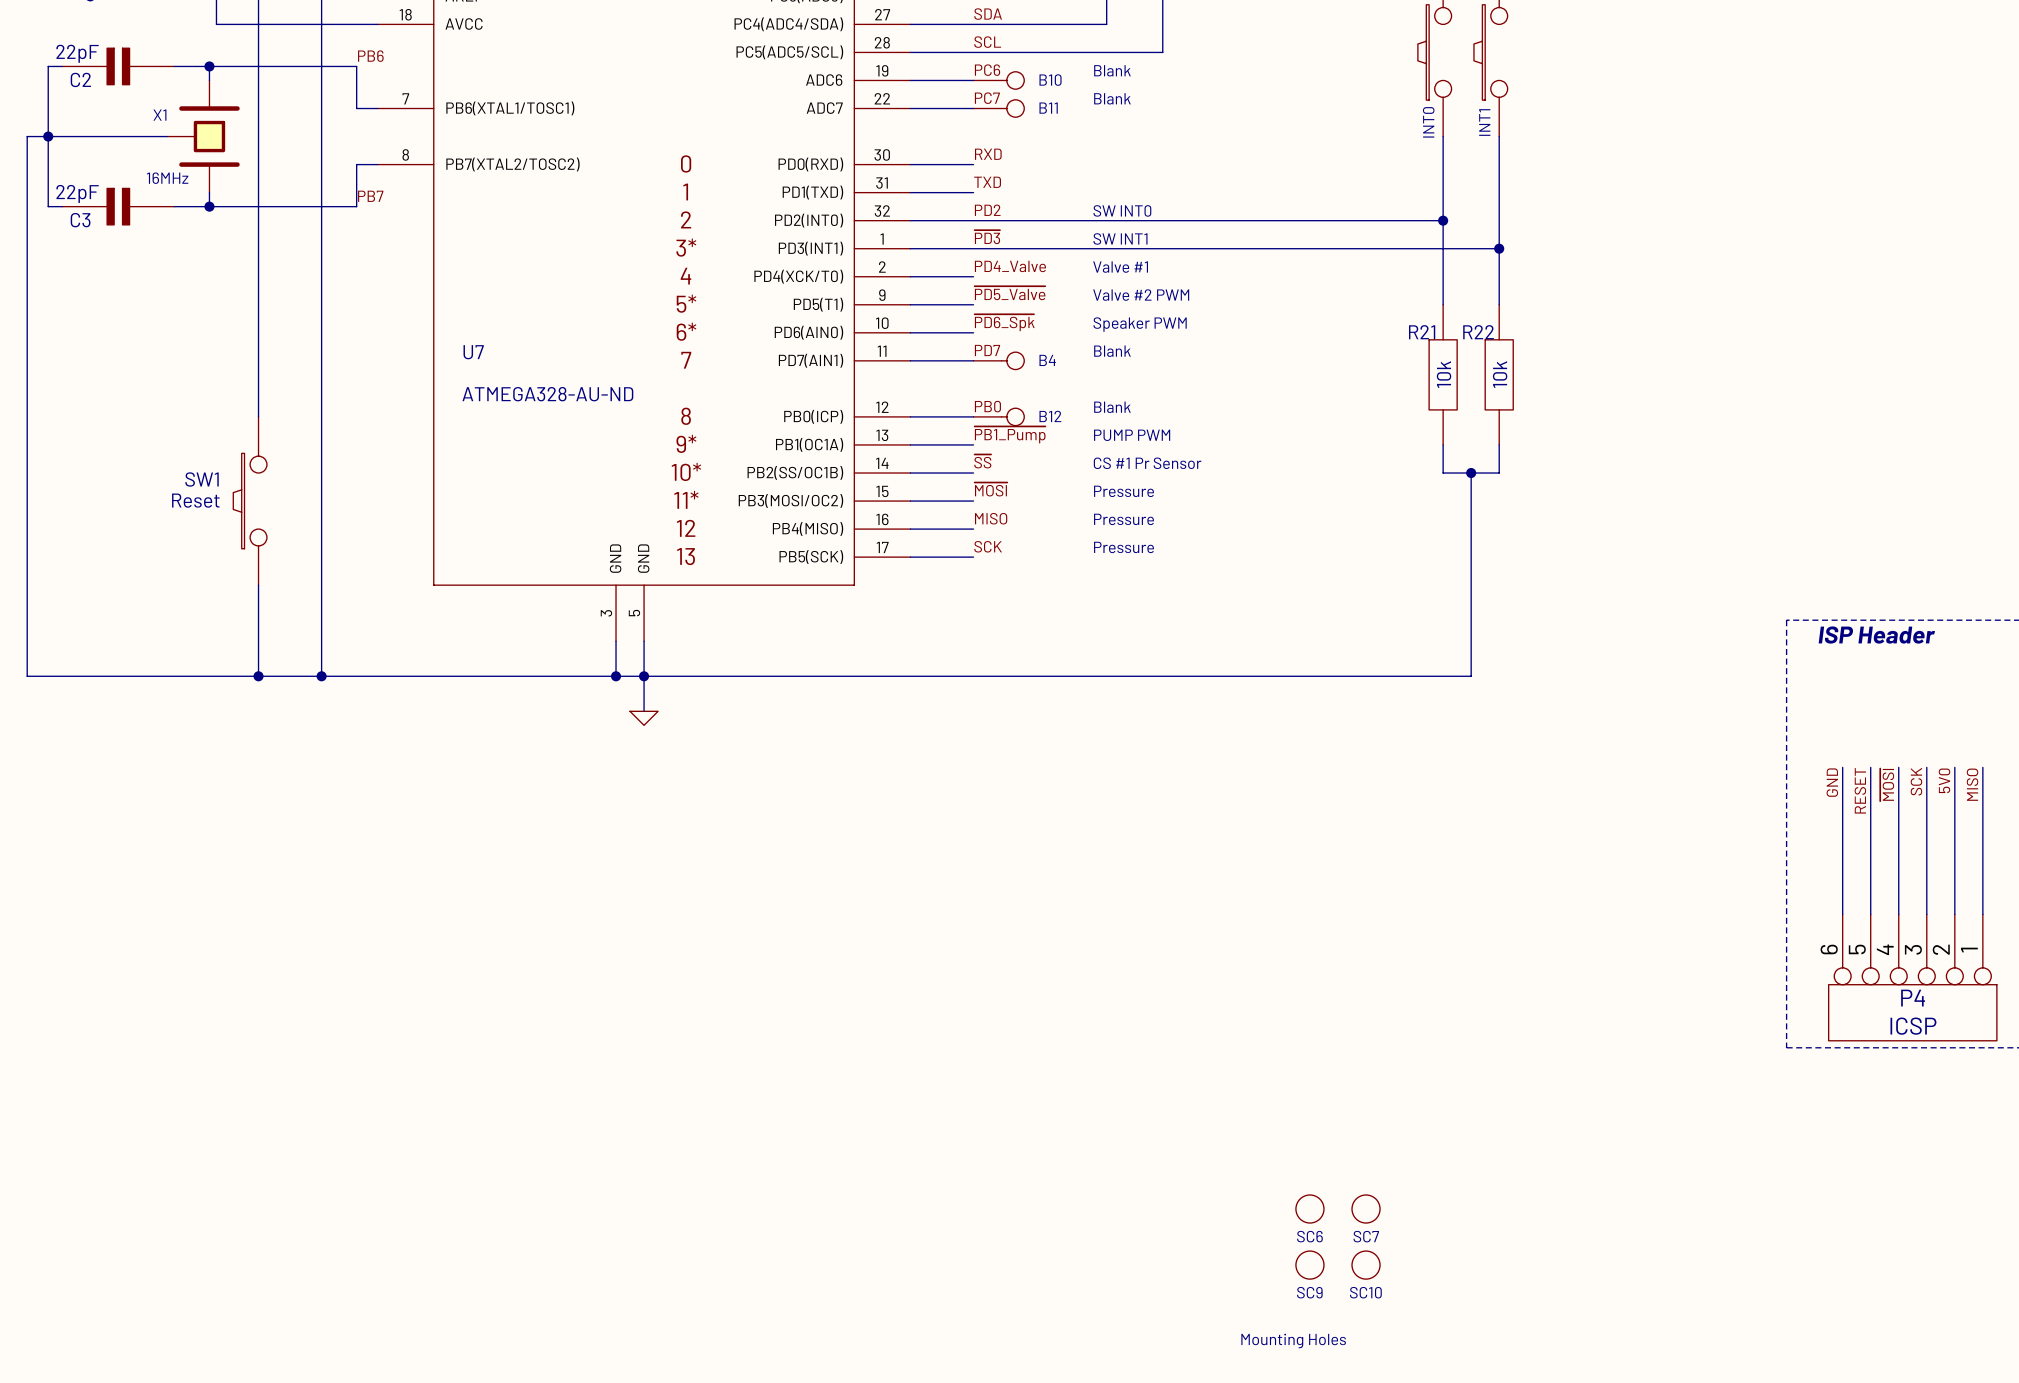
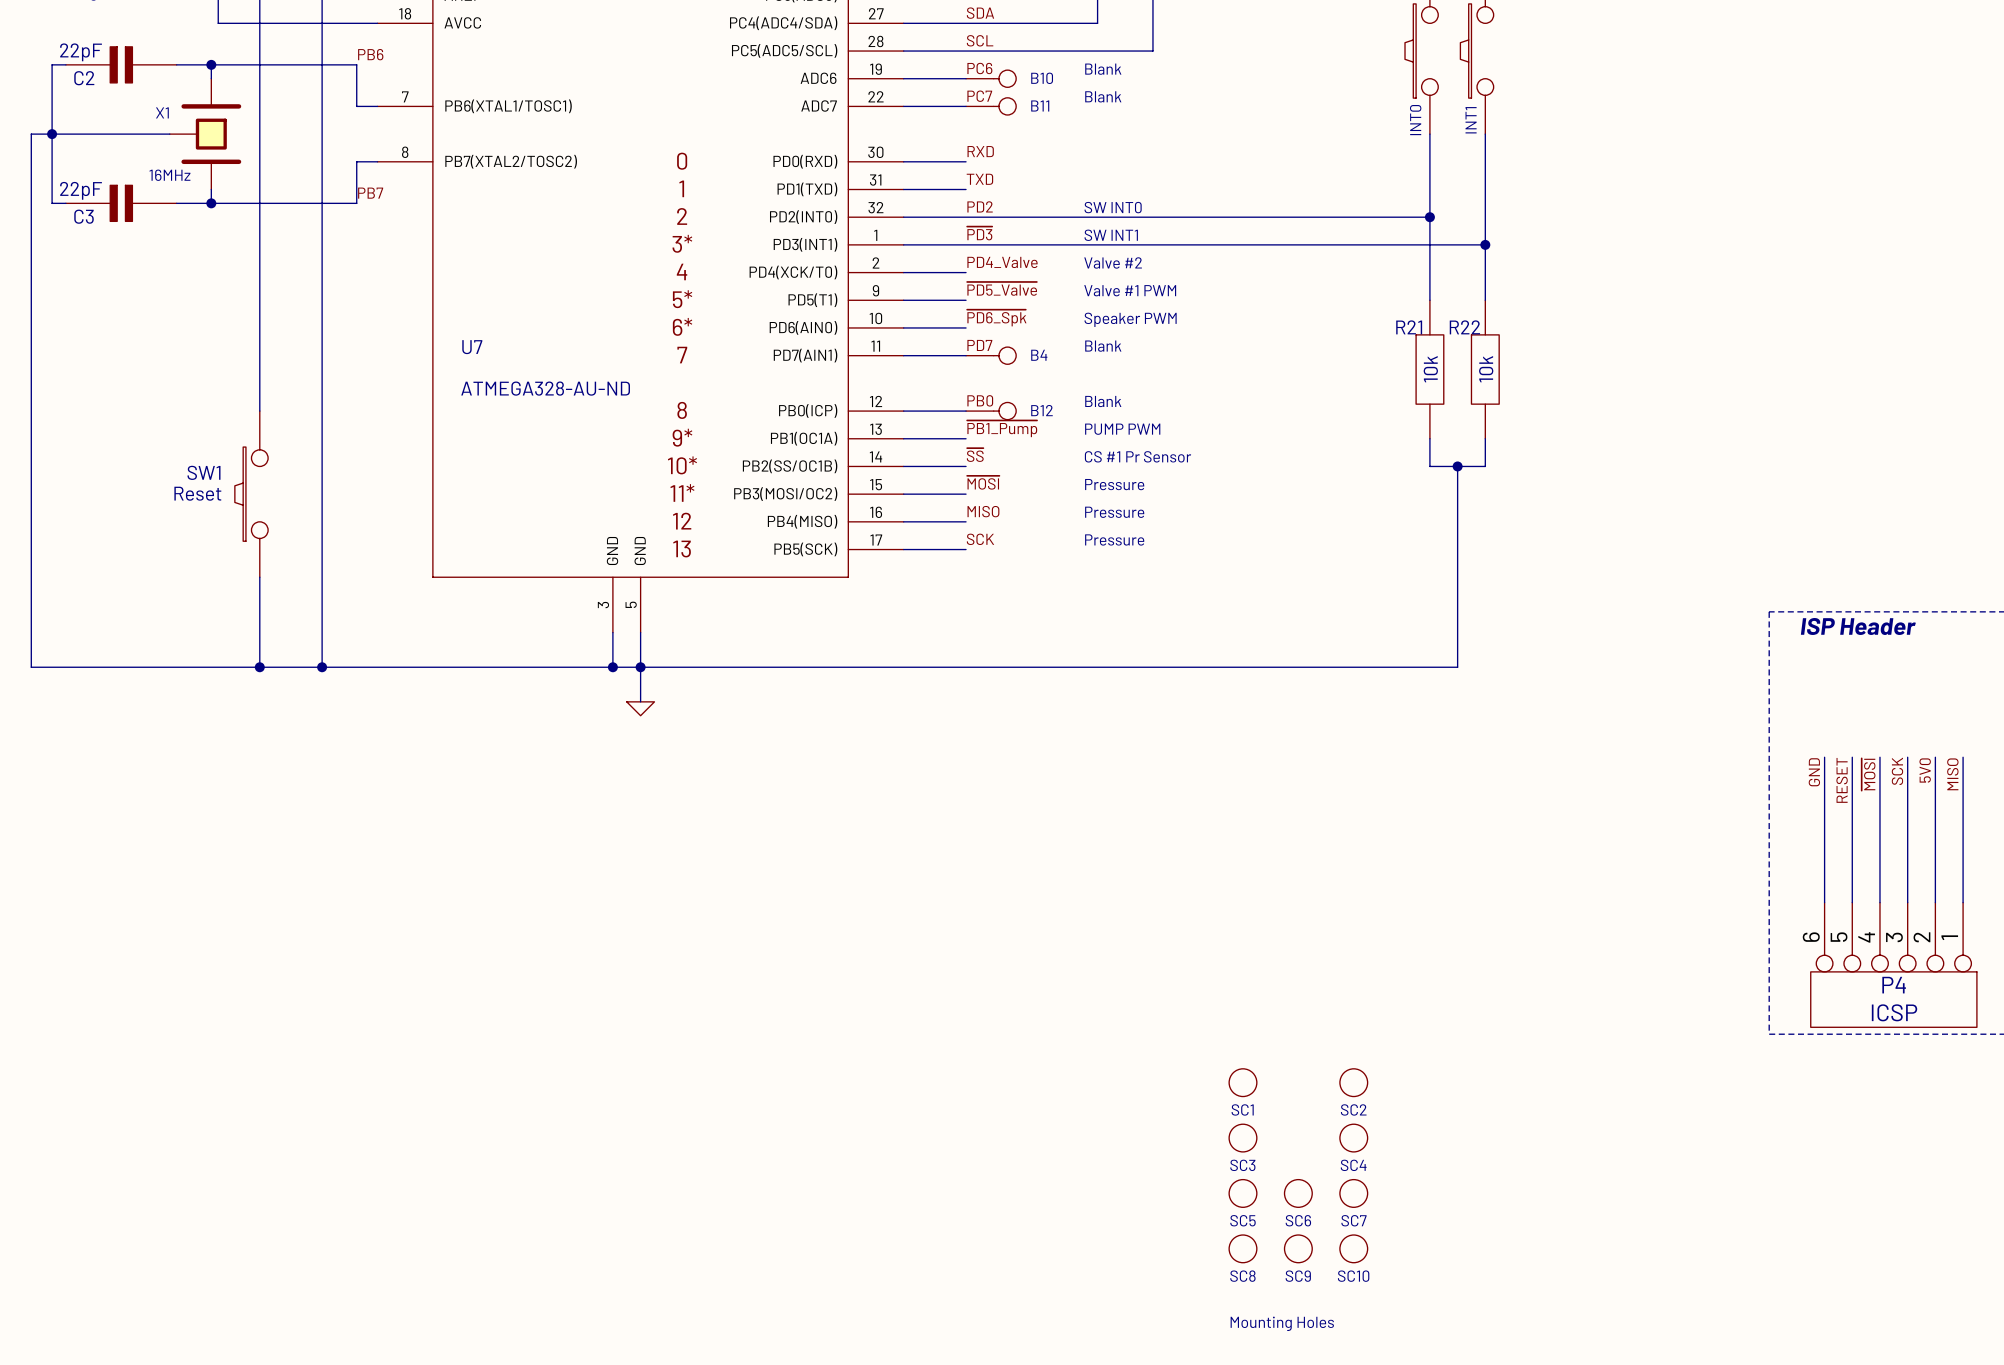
text: Valve #1 (1120, 267) -> Valve #2 (1113, 262)
text: Valve #2 PWM (1141, 295) -> Valve #1 PWM (1130, 290)
SC1: none -> (1242, 1082)
SC2: none -> (1353, 1082)
SC3: none -> (1242, 1138)
SC4: none -> (1353, 1138)
SC5: none -> (1242, 1193)
SC8: none -> (1242, 1248)

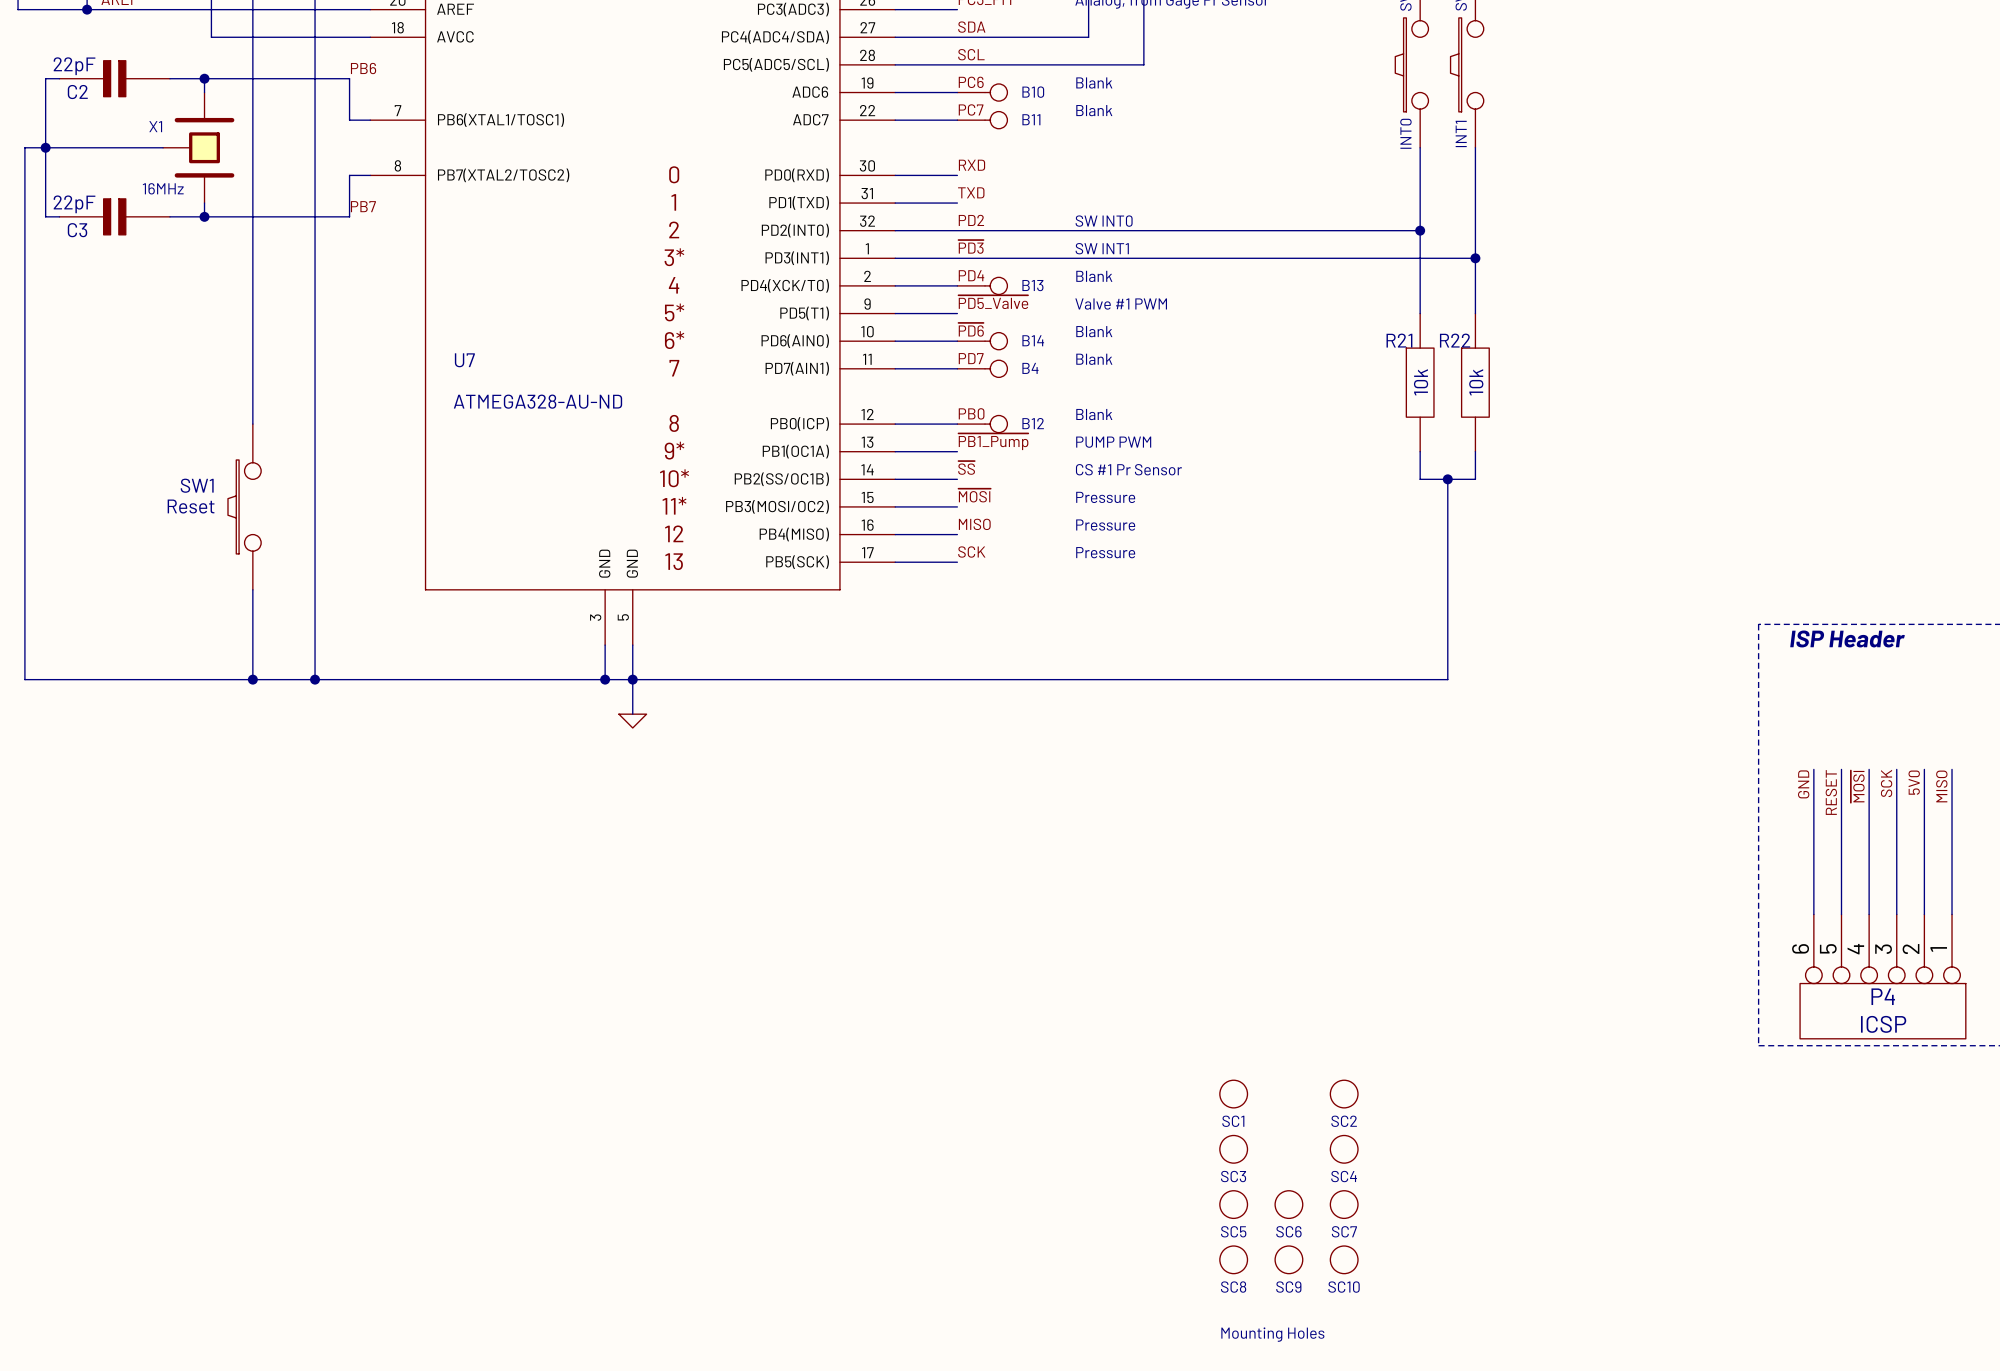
label: PD4_Valve (1002, 262) -> PD4 (971, 275)
text: Valve #2 (1113, 262) -> Blank (1094, 276)
B13: none -> (982, 285)
label: ~{PD6_Spk} (996, 318) -> ~{PD6} (971, 329)
text: Speaker PWM (1130, 319) -> Blank (1094, 331)
B14: none -> (982, 341)

